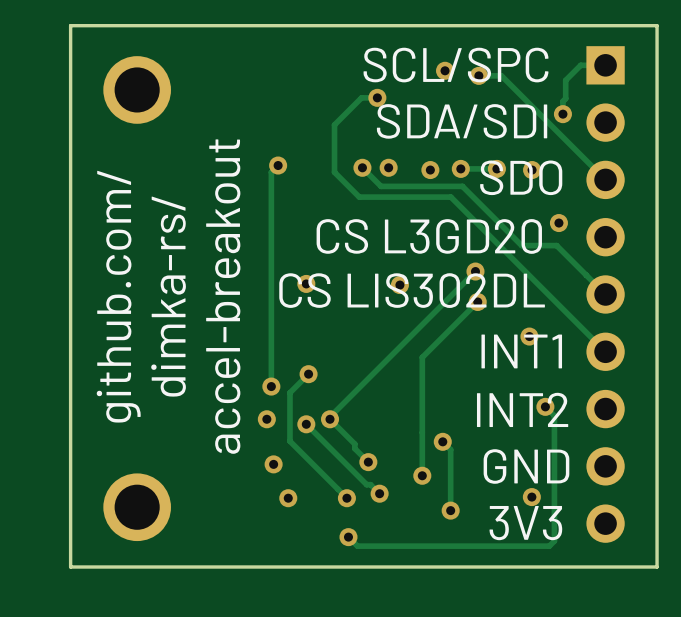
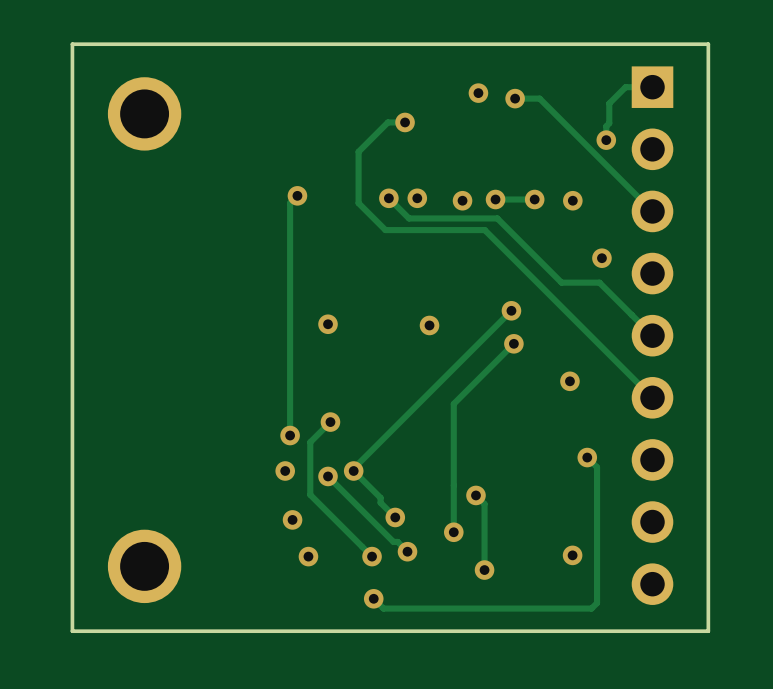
text: SCL/SPC (456, 65) -> none
text: SDA/SDI (462, 121) -> none
text: SDO (521, 177) -> none
text: CS L3GD20 (429, 236) -> none
text: CS LIS302DL (412, 290) -> none
text: github.com/ (118, 296) -> none
text: dimka-rs/ (168, 296) -> none
text: accel-breakout (223, 296) -> none
text: INT1 (521, 351) -> none
text: INT2 (522, 409) -> none
text: GND (526, 466) -> none
text: 3V3 (525, 523) -> none

